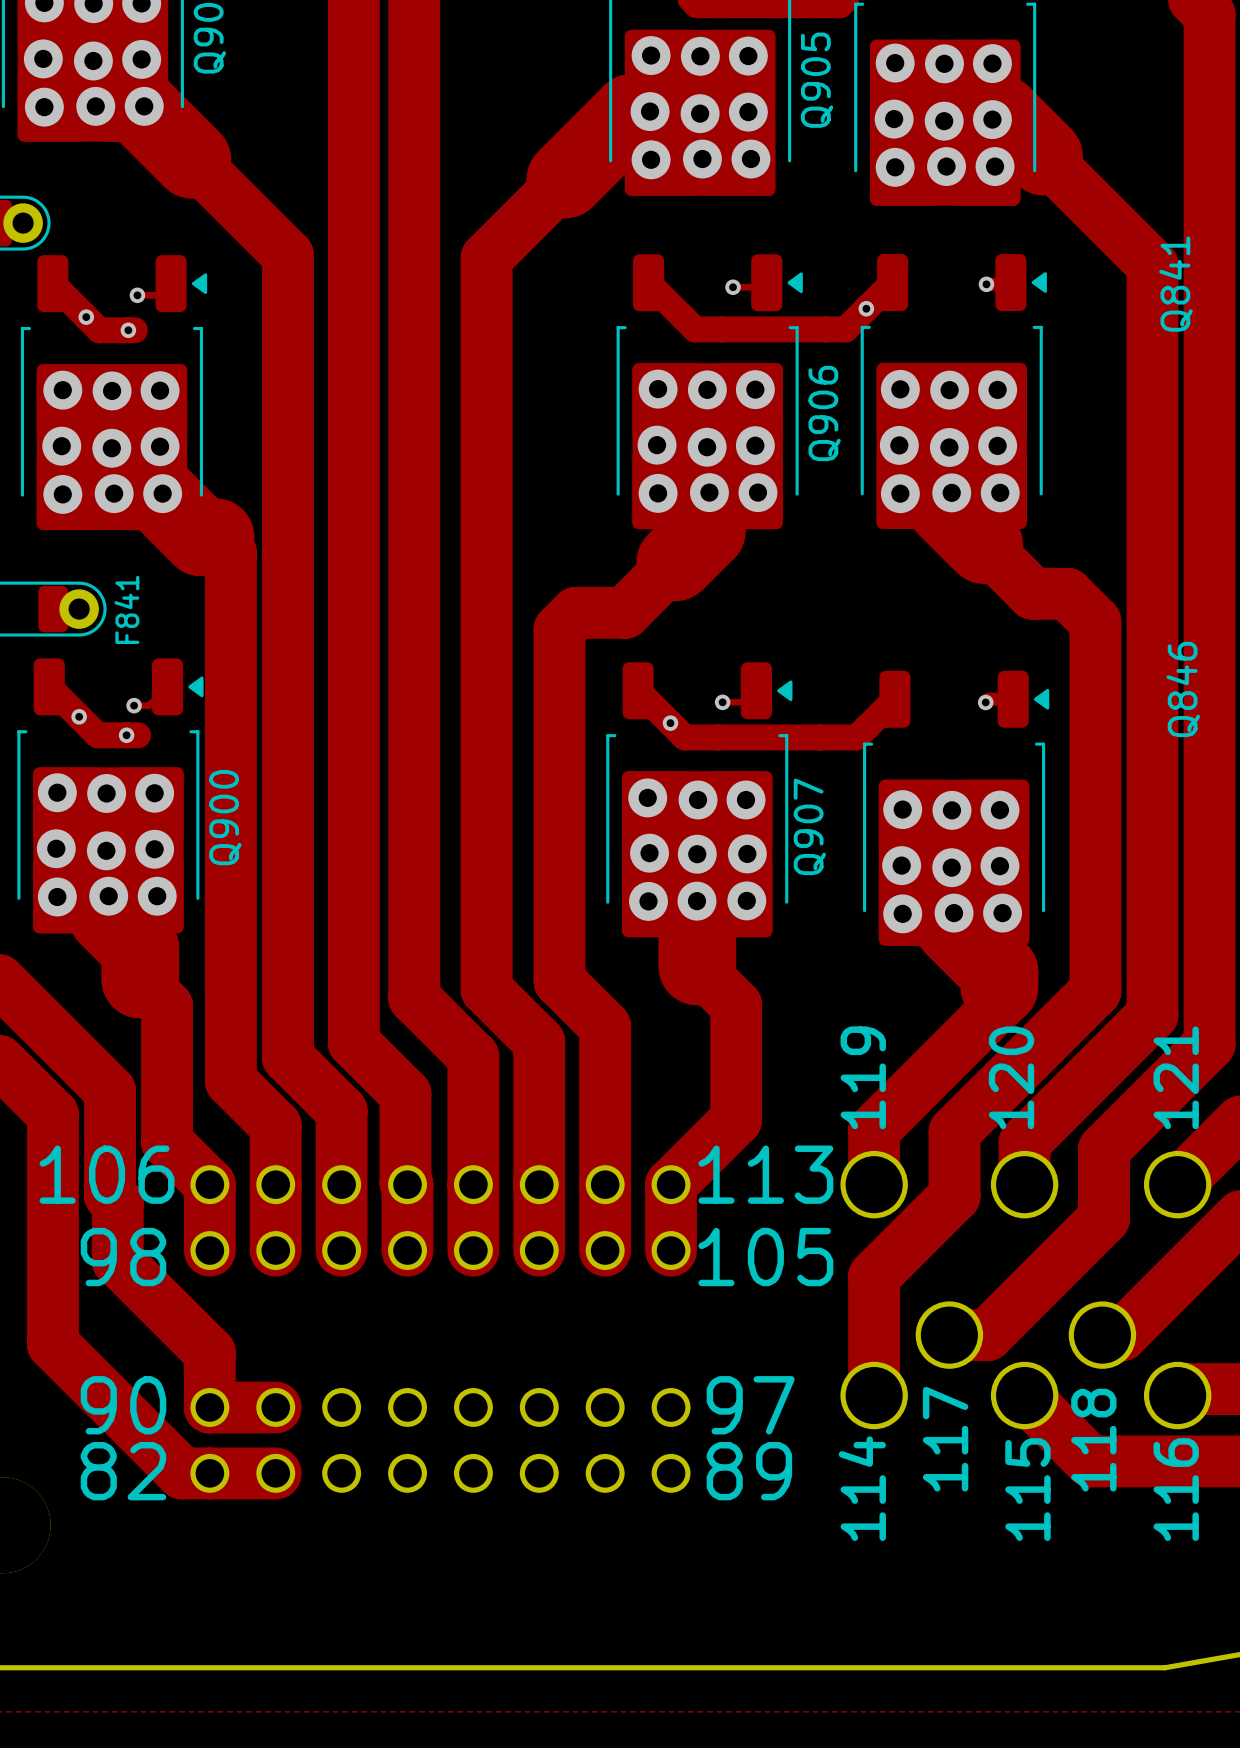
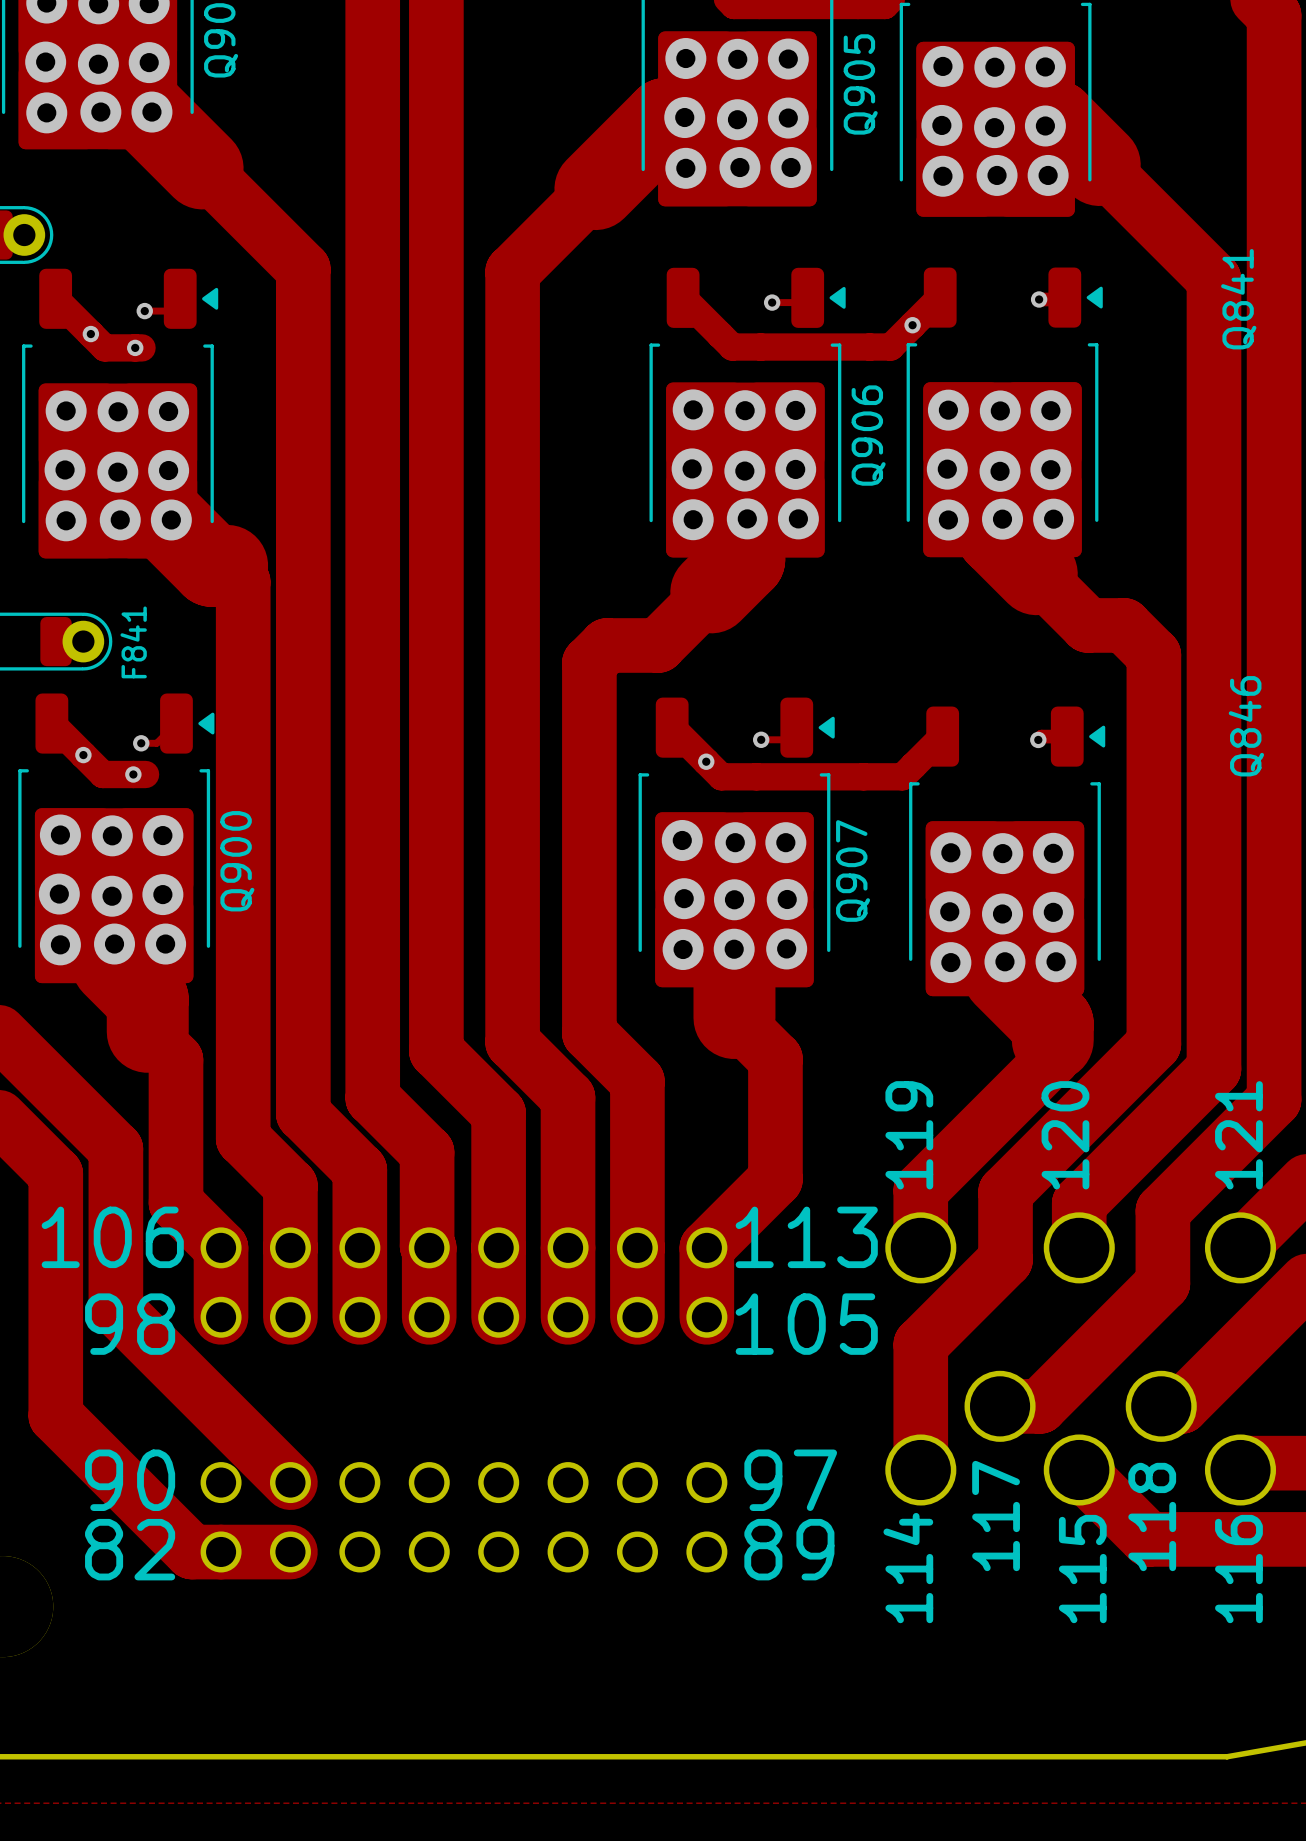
track: (110, 1195) (117, 1203) (117, 1260) (209, 1352) (209, 1407) (275, 1407) -> (115, 1259) (115, 1308) (290, 1482)

